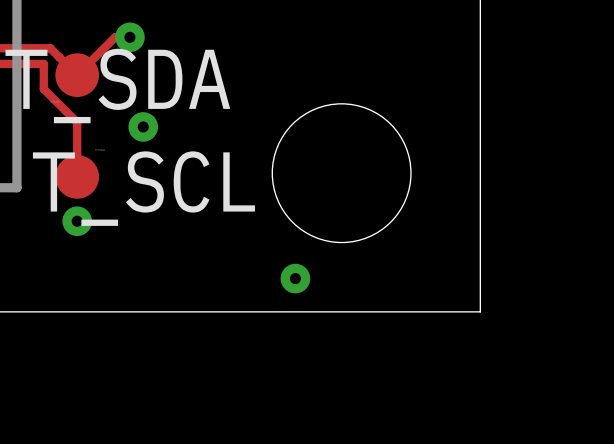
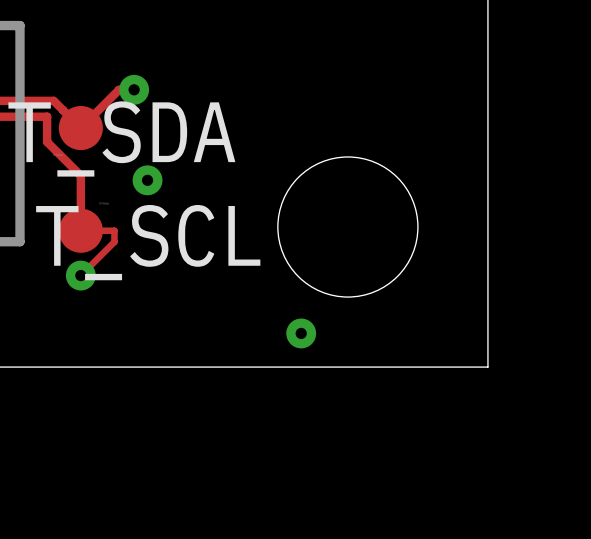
track: none -> (80, 230) (114, 230) (114, 241) (80, 275)

